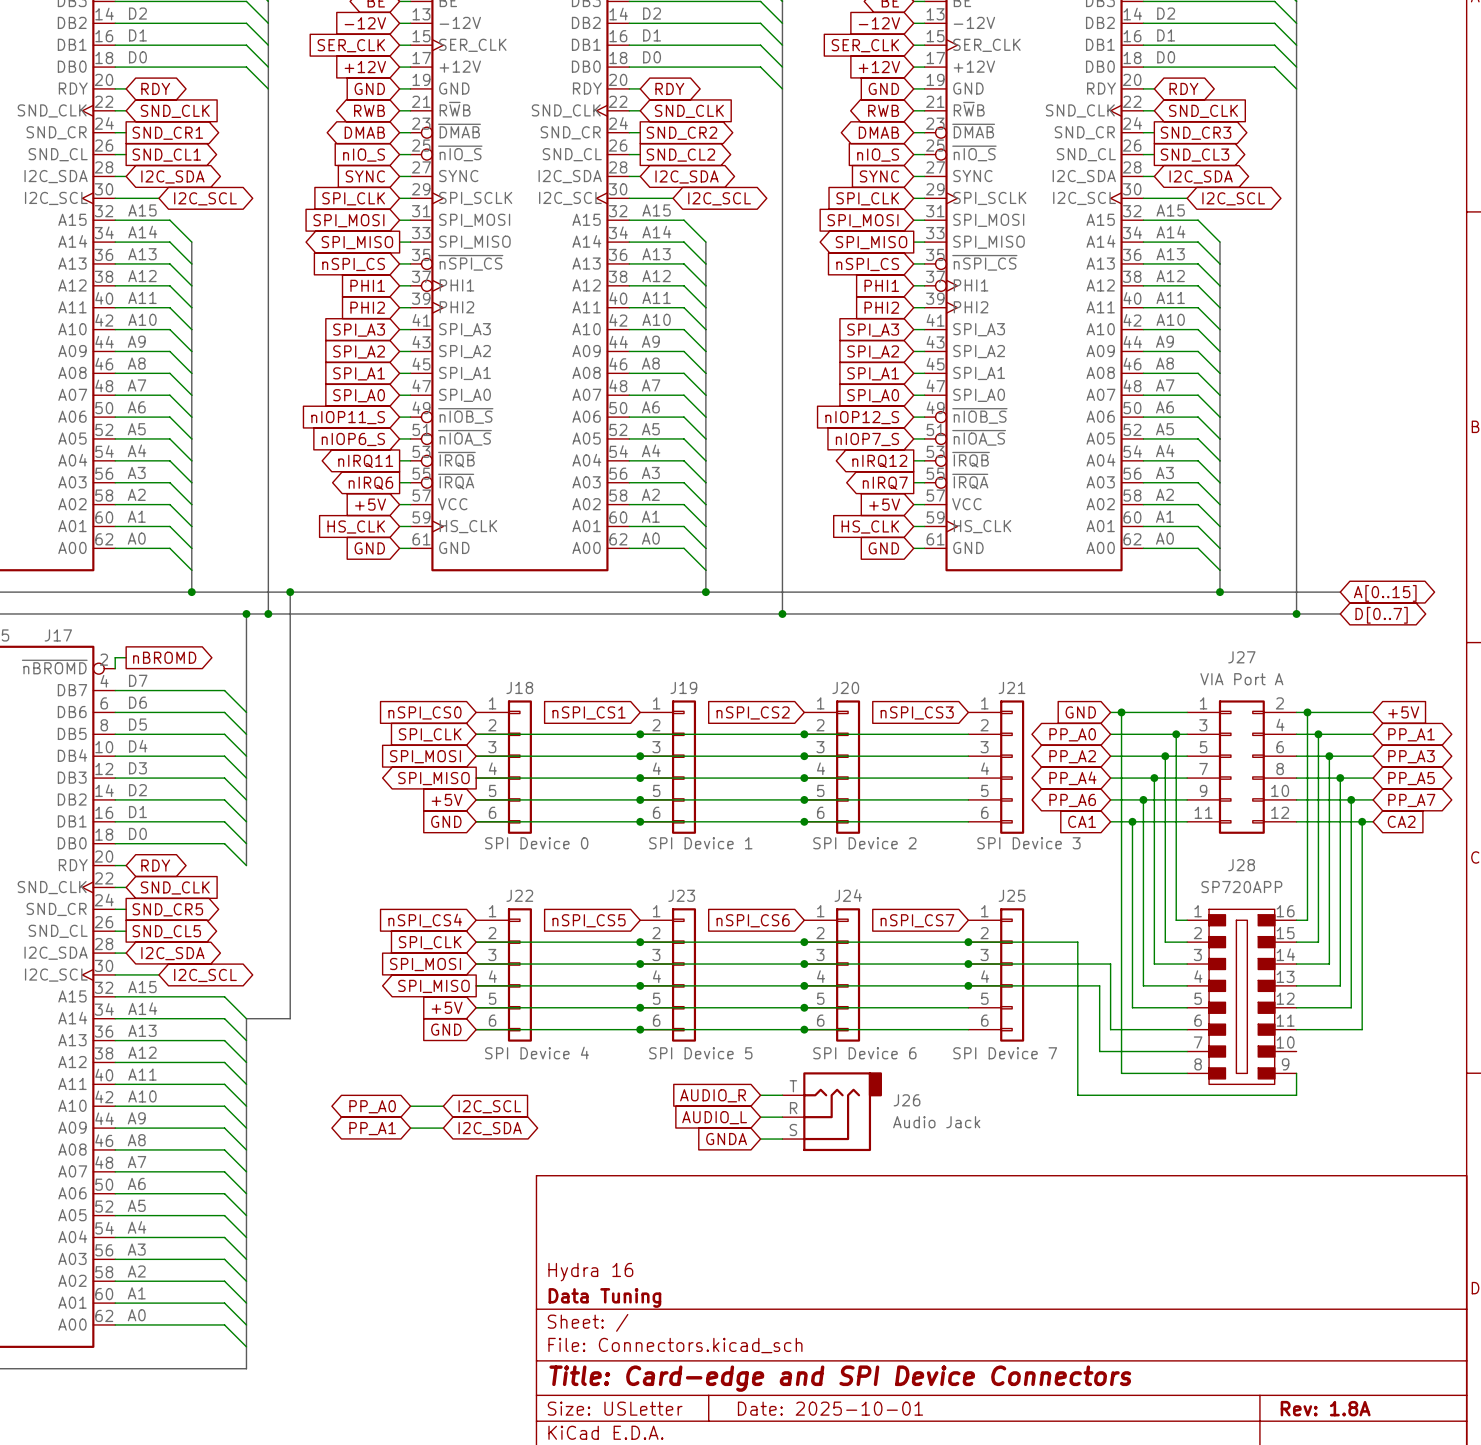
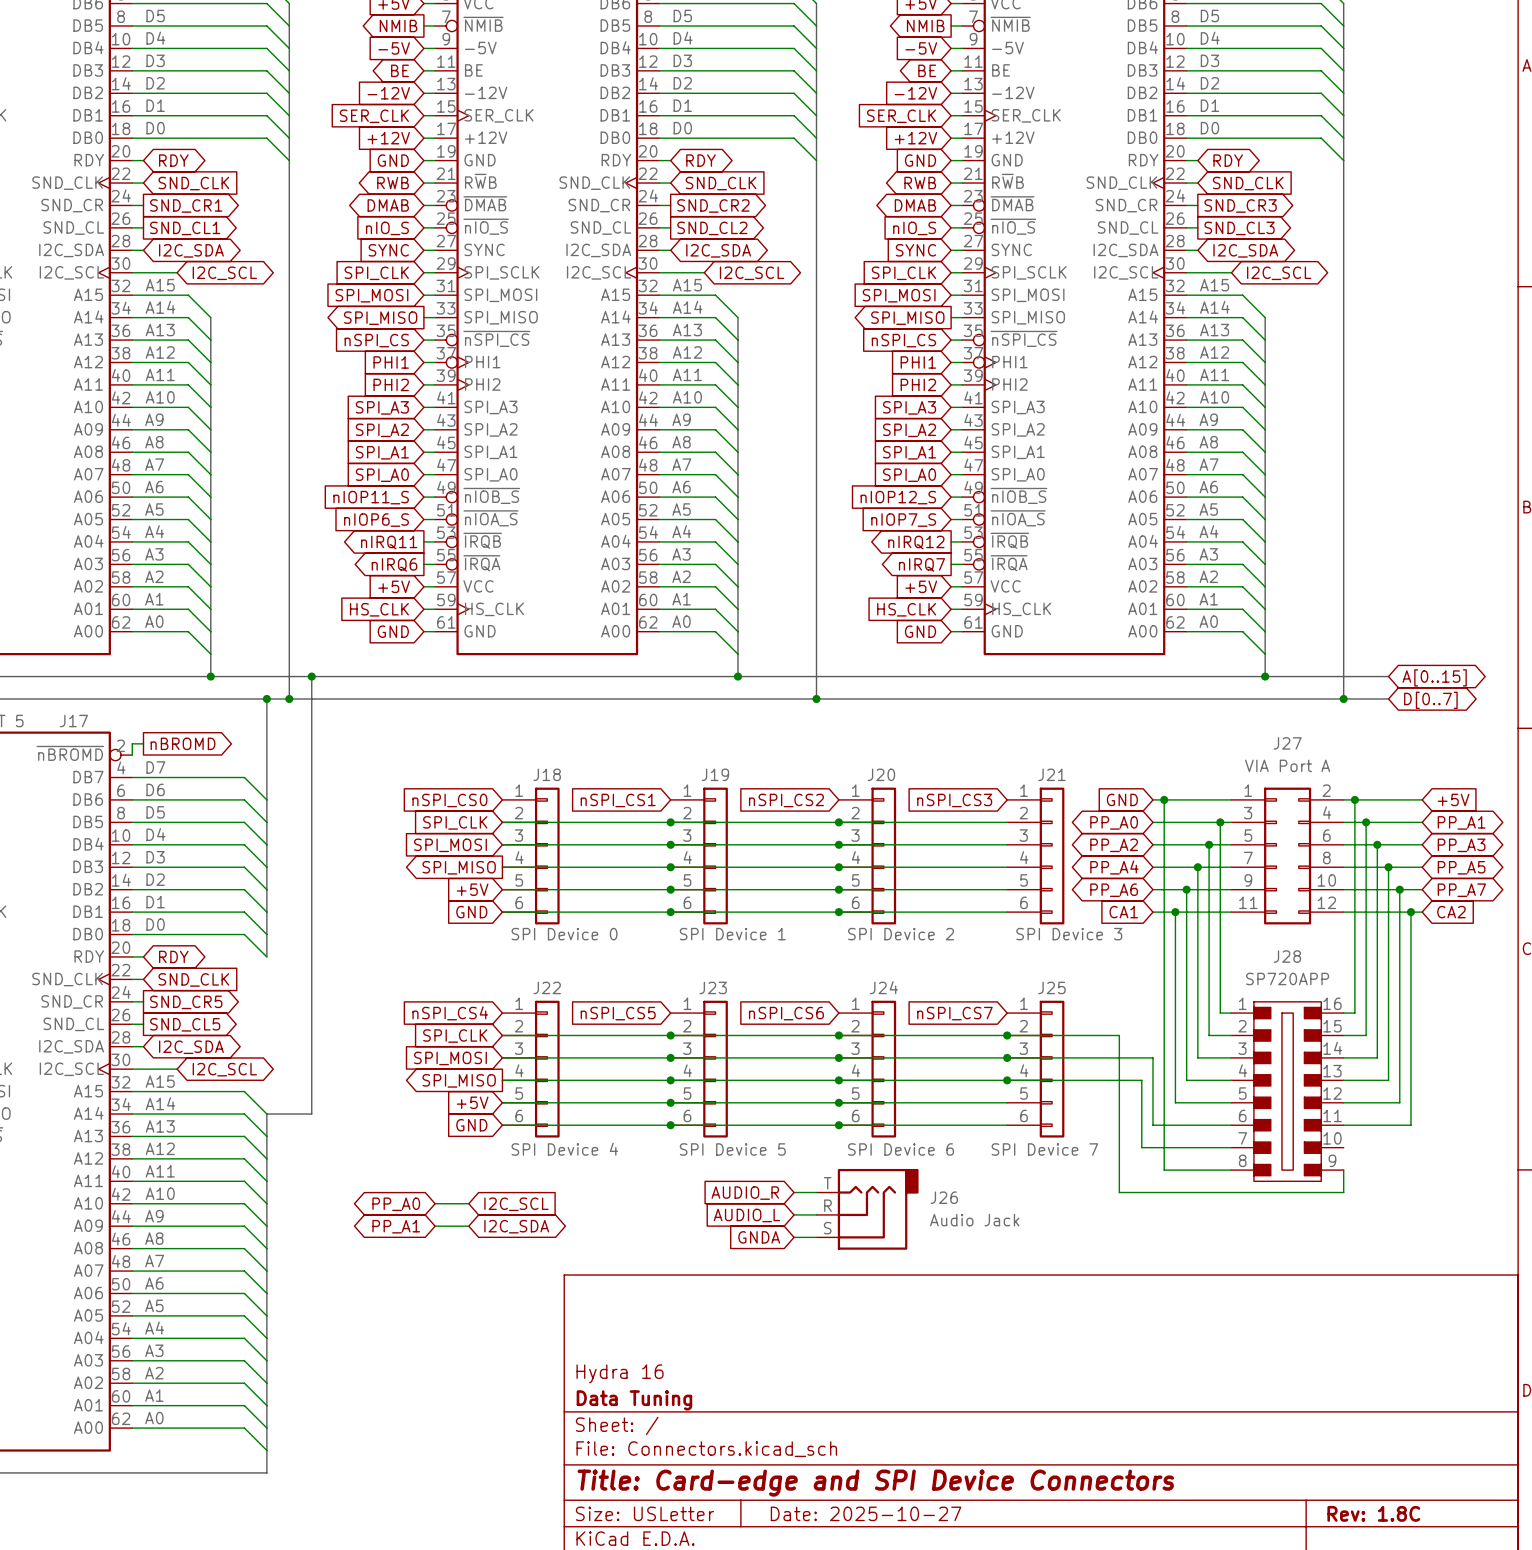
title block: Date: 2025-10-01 (830, 1408) -> Date: 2025-10-27 (866, 1513)
title block: Rev: 1.8A (1325, 1408) -> Rev: 1.8C (1373, 1513)

